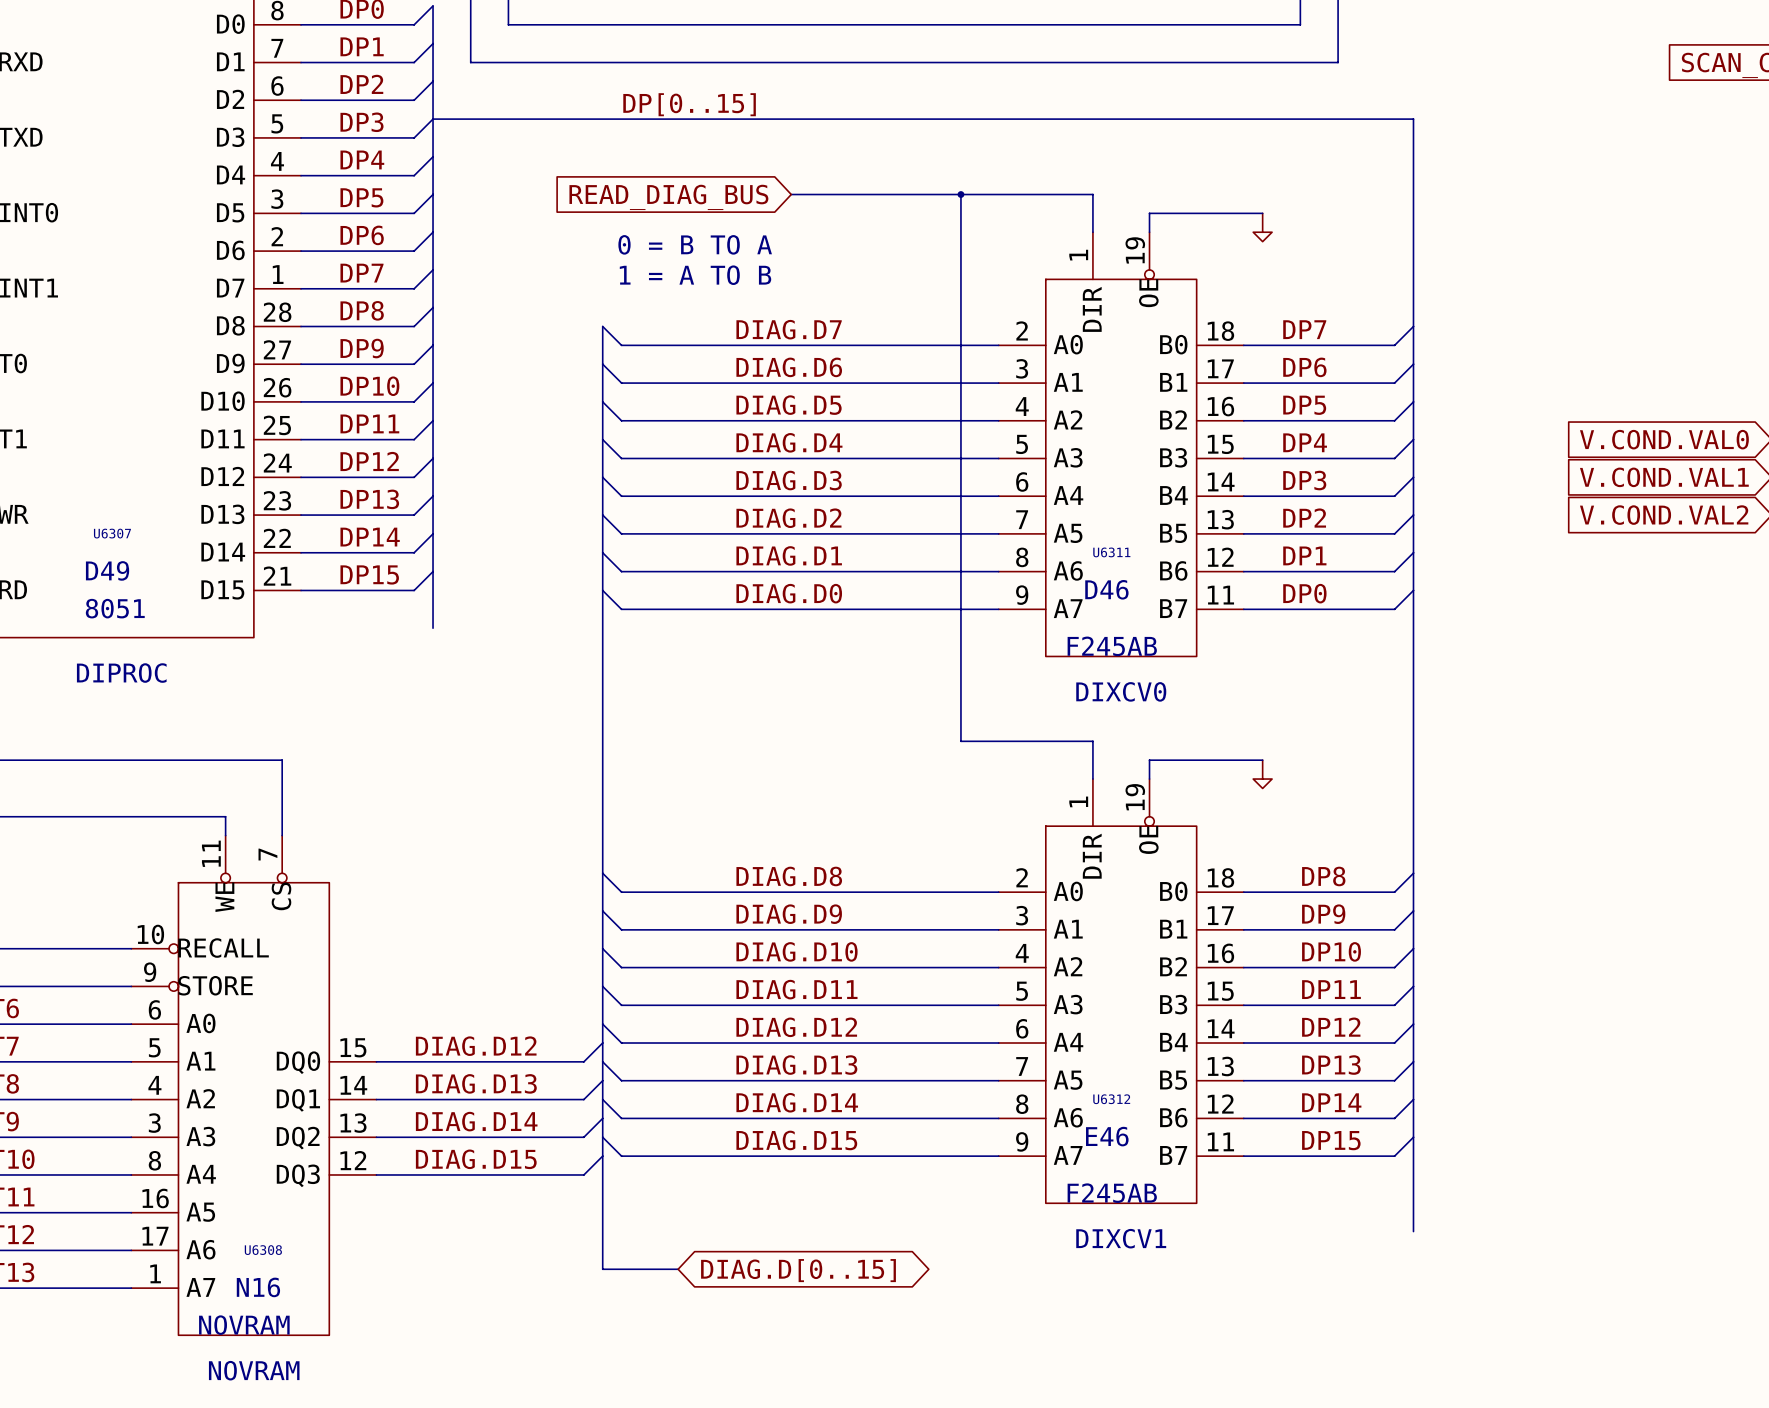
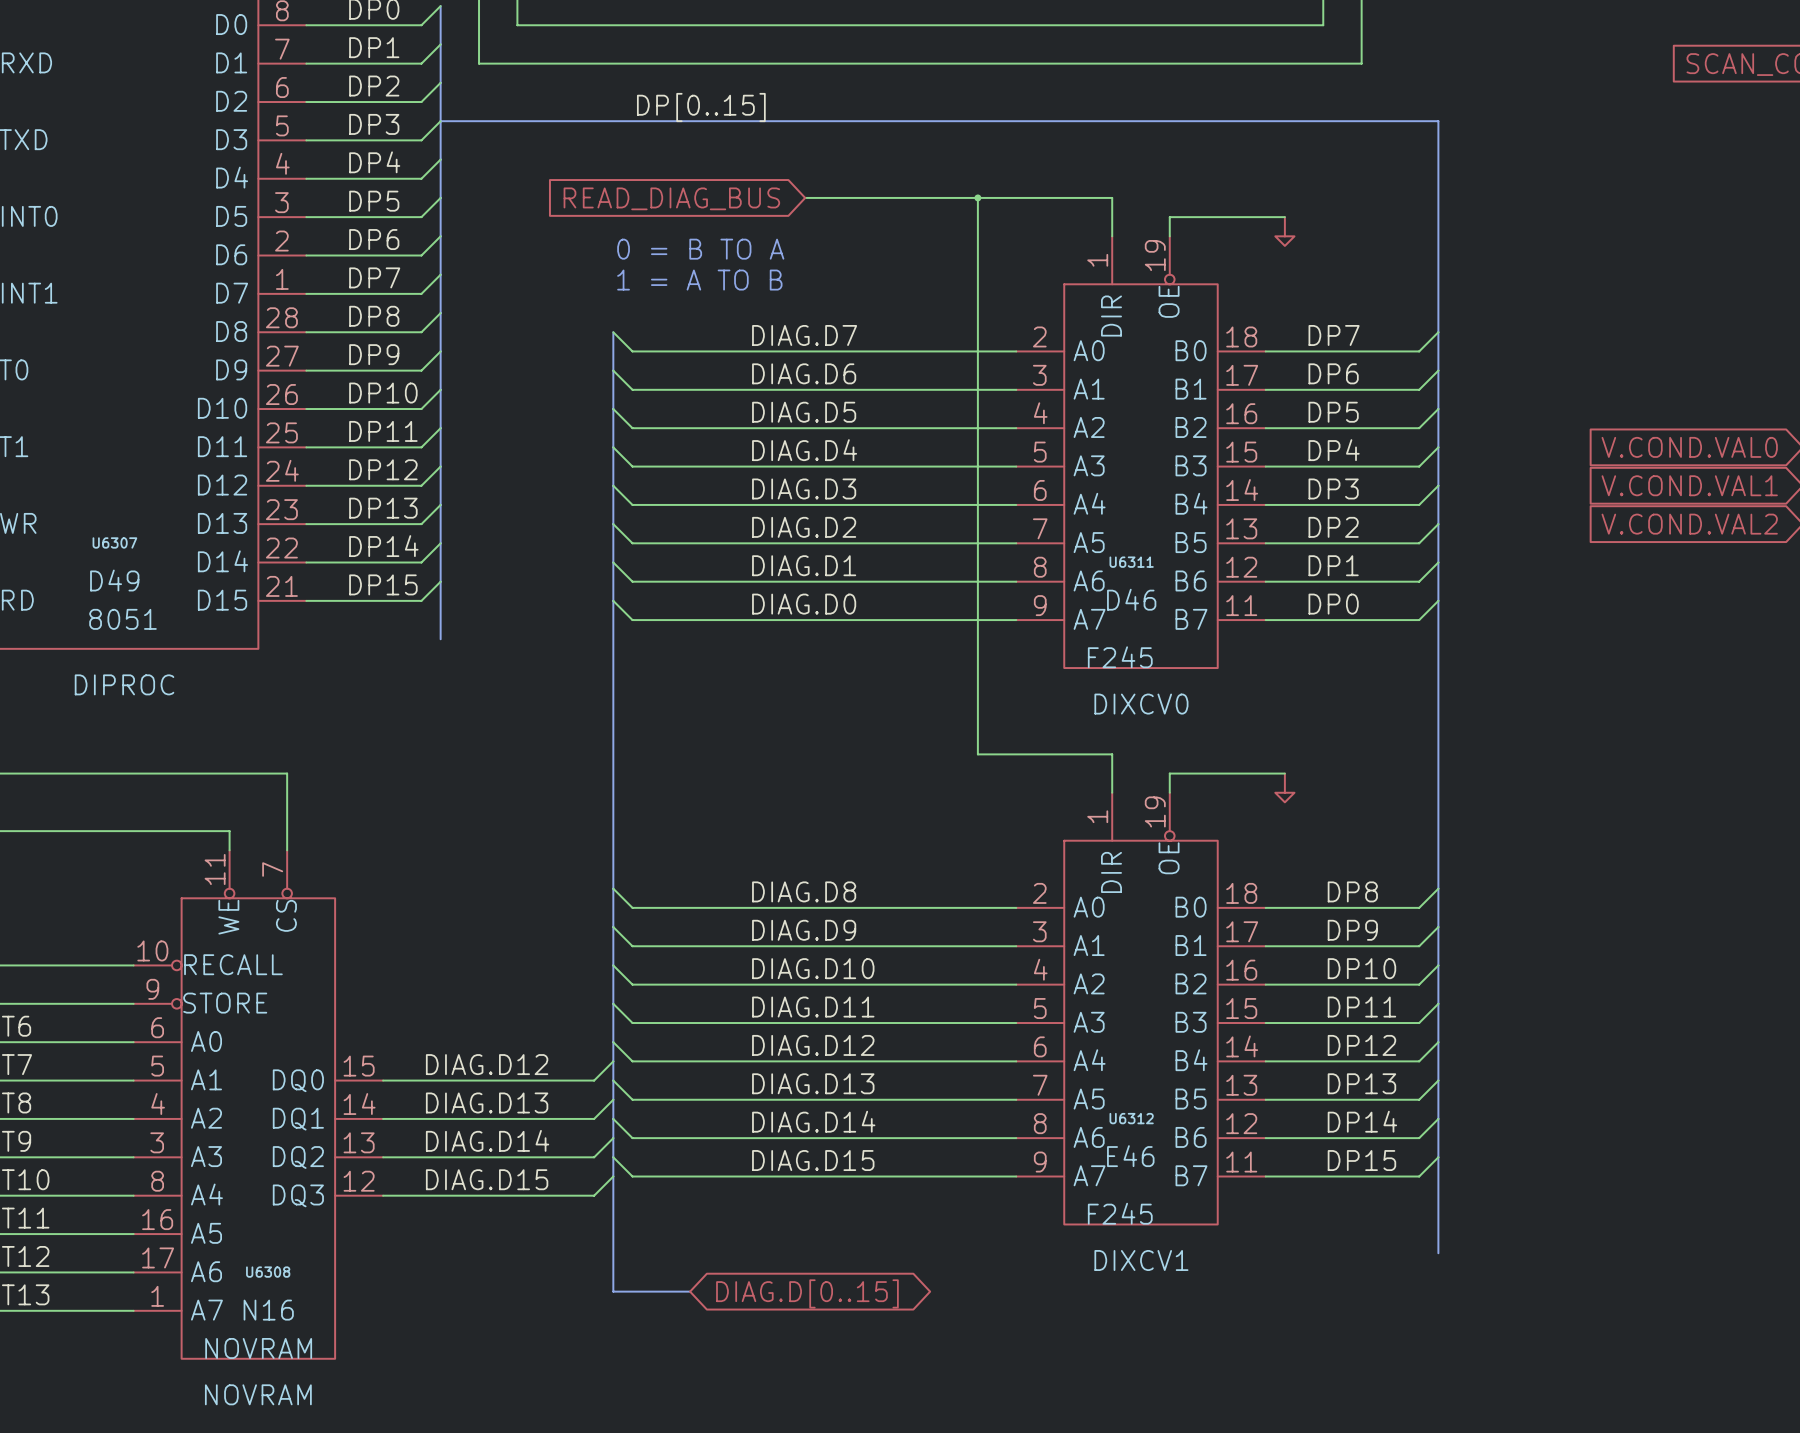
U6311 value: F245AB (1112, 646) -> F245 (1120, 657)
U6312 value: F245AB (1112, 1193) -> F245 (1120, 1213)

